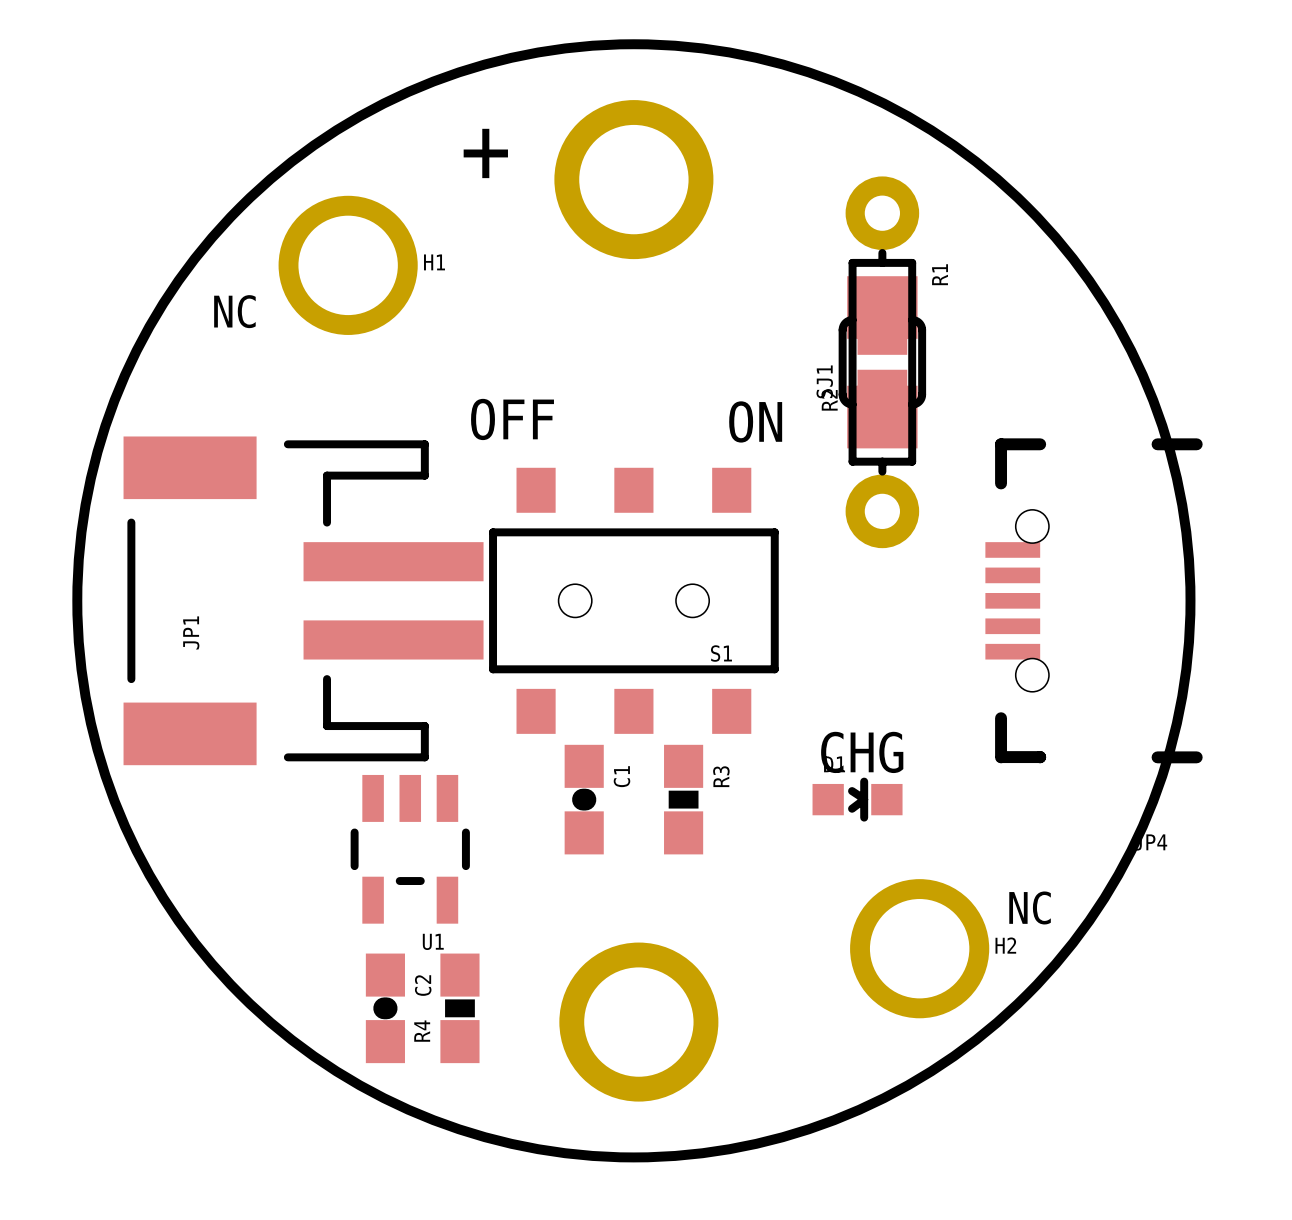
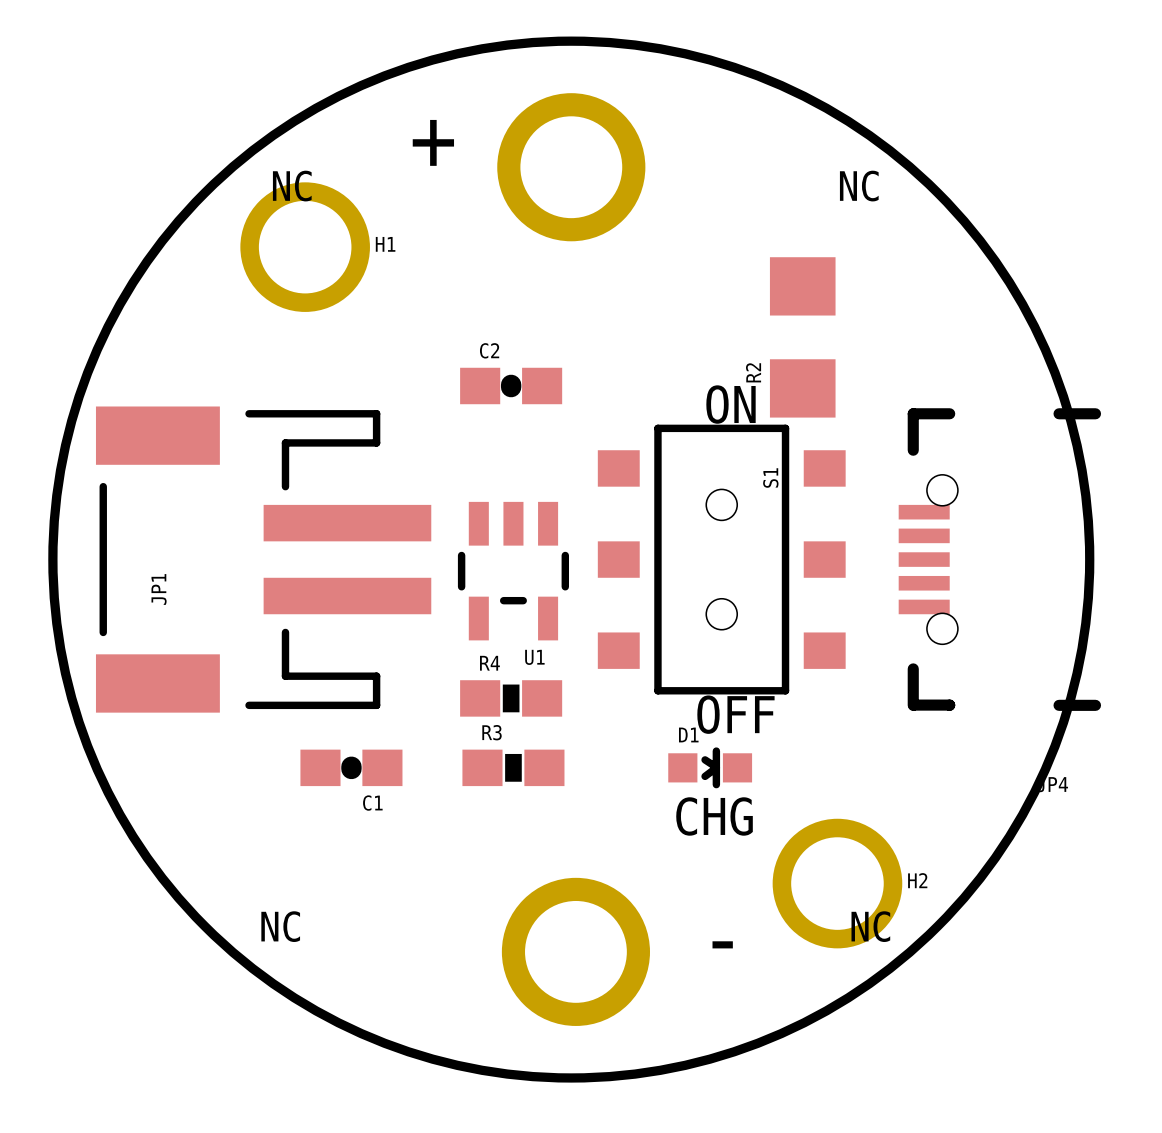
text: none -> NC (859, 186)
text position: NC (234, 311) -> NC (292, 186)
R1: (882, 362) -> none
SJ1: (882, 362) -> none
text position: OFF (512, 419) -> OFF (735, 714)
text position: ON (755, 421) -> ON (731, 404)
S1 rotation: 0° (633, 600) -> 90° clockwise (721, 559)
S1 name position: S1 (721, 653) -> S1 (770, 478)
text position: CHG (862, 752) -> CHG (714, 816)
C1 rotation: 0° (584, 799) -> 90° clockwise (351, 767)
C1 position: (584, 799) -> (351, 767)
R3 rotation: 0° (683, 799) -> 90° clockwise (513, 767)
R3 position: (683, 799) -> (513, 767)
D1 position: (857, 799) -> (710, 767)
U1 position: (410, 849) -> (513, 571)
text position: NC (1030, 907) -> NC (870, 926)
text: none -> NC (280, 926)
C2 rotation: 0° (385, 1008) -> 90° clockwise (511, 385)
C2 position: (385, 1008) -> (511, 385)
R4 rotation: 0° (459, 1008) -> 90° clockwise (511, 698)
R4 position: (459, 1008) -> (511, 698)
text: none -> - (722, 944)

